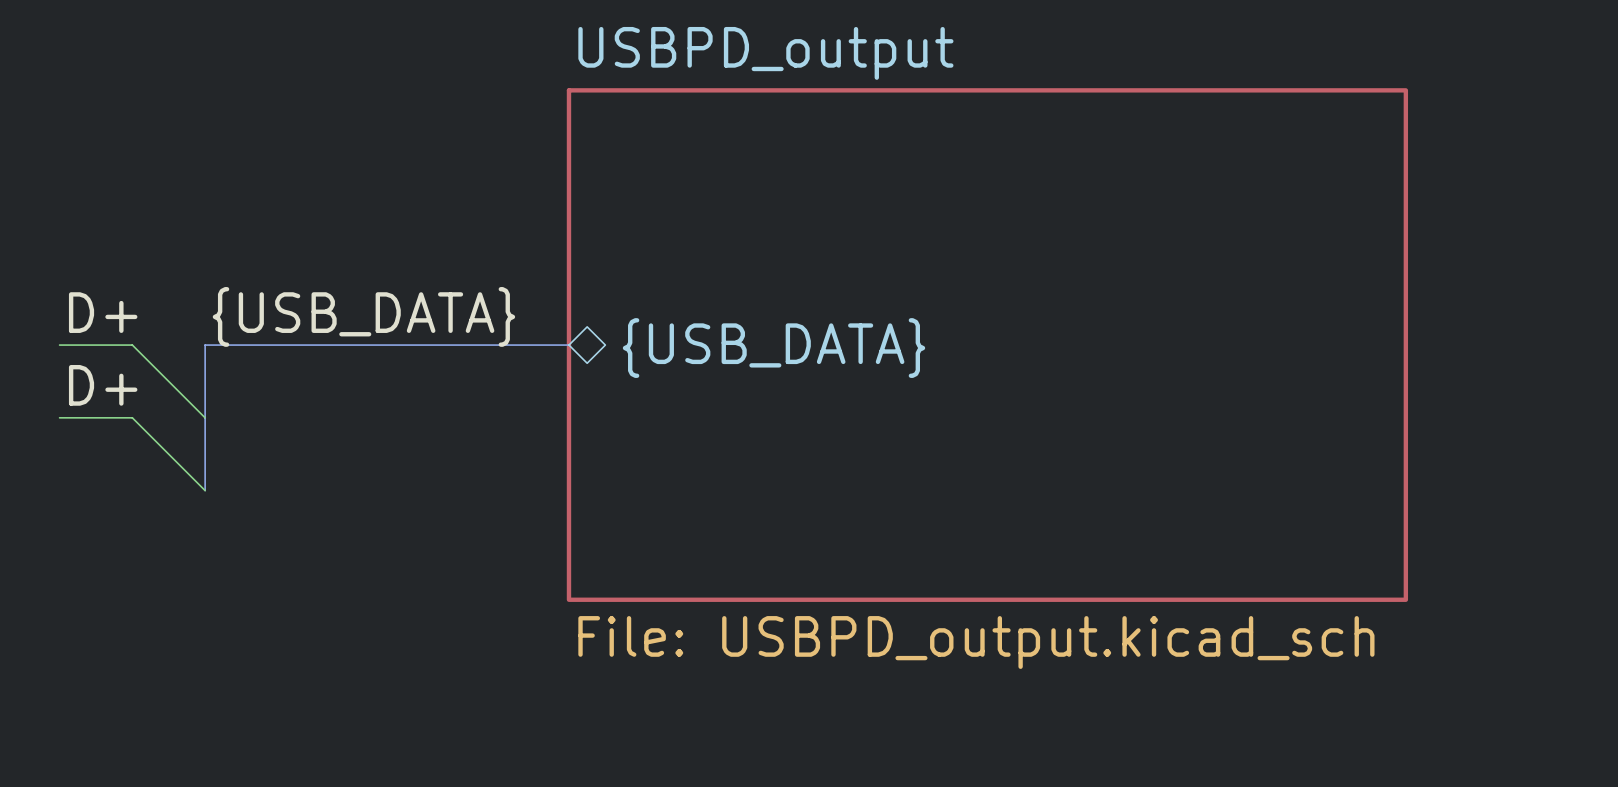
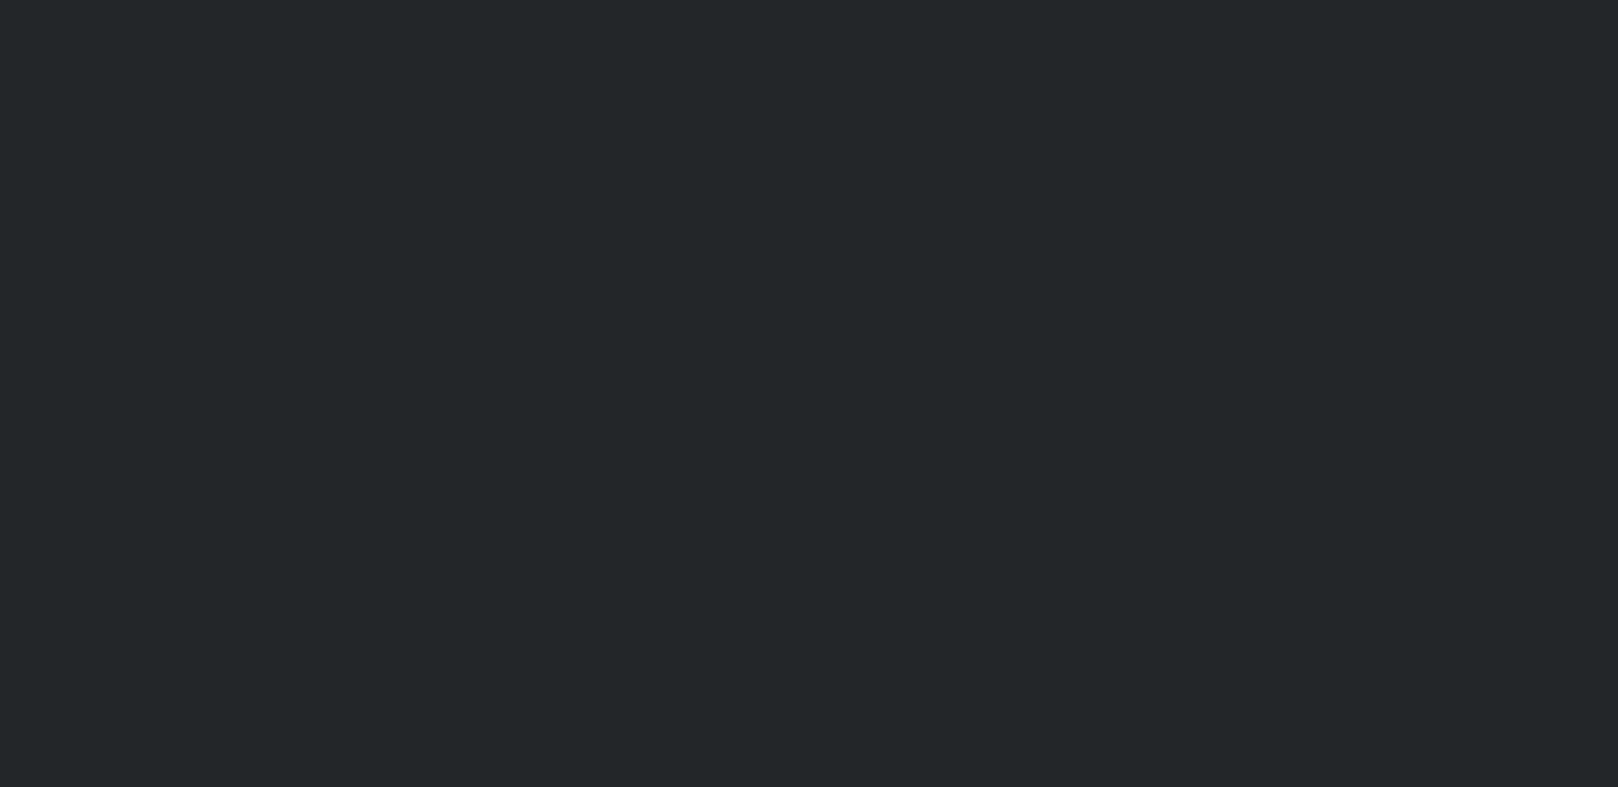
label: D+ (103, 312) -> none
label: {USB_DATA} (363, 316) -> none
wire: (59, 345) (132, 345) (205, 417) -> none
bus: (568, 345) (205, 345) (205, 490) -> none
sheet USBPD_output: File: USBPD_output.kicad_sch (987, 345) -> none
sheet pin: {USB_DATA} (774, 348) -> none
label: D+ (103, 385) -> none
wire: (59, 417) (132, 417) (205, 490) -> none

